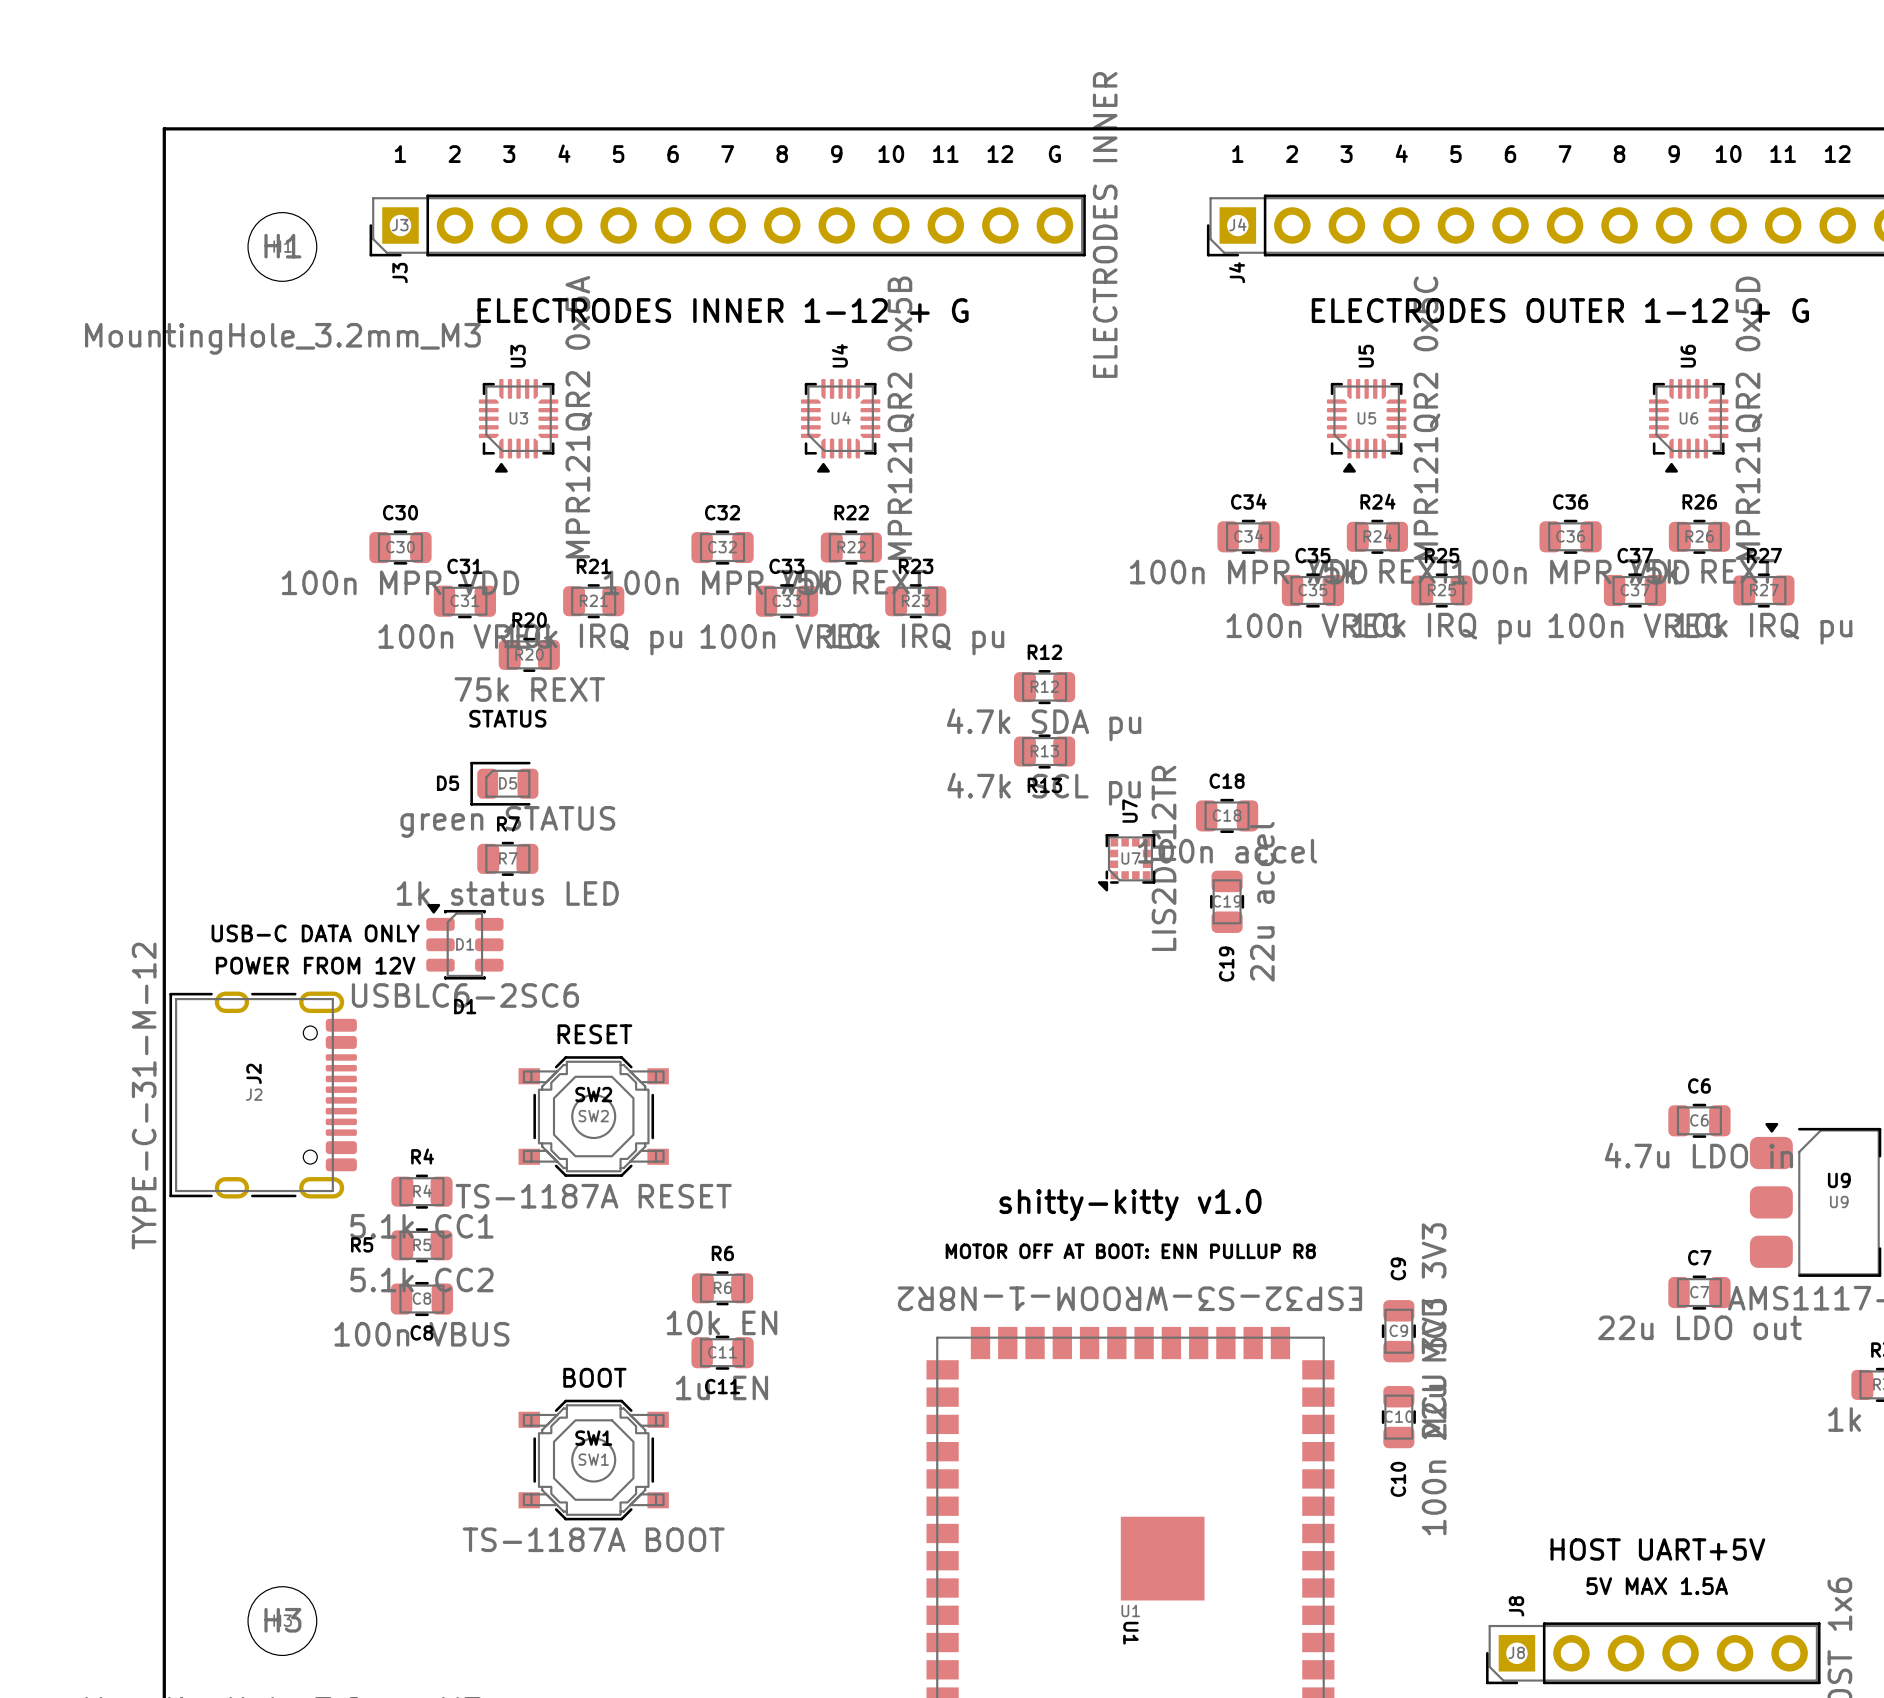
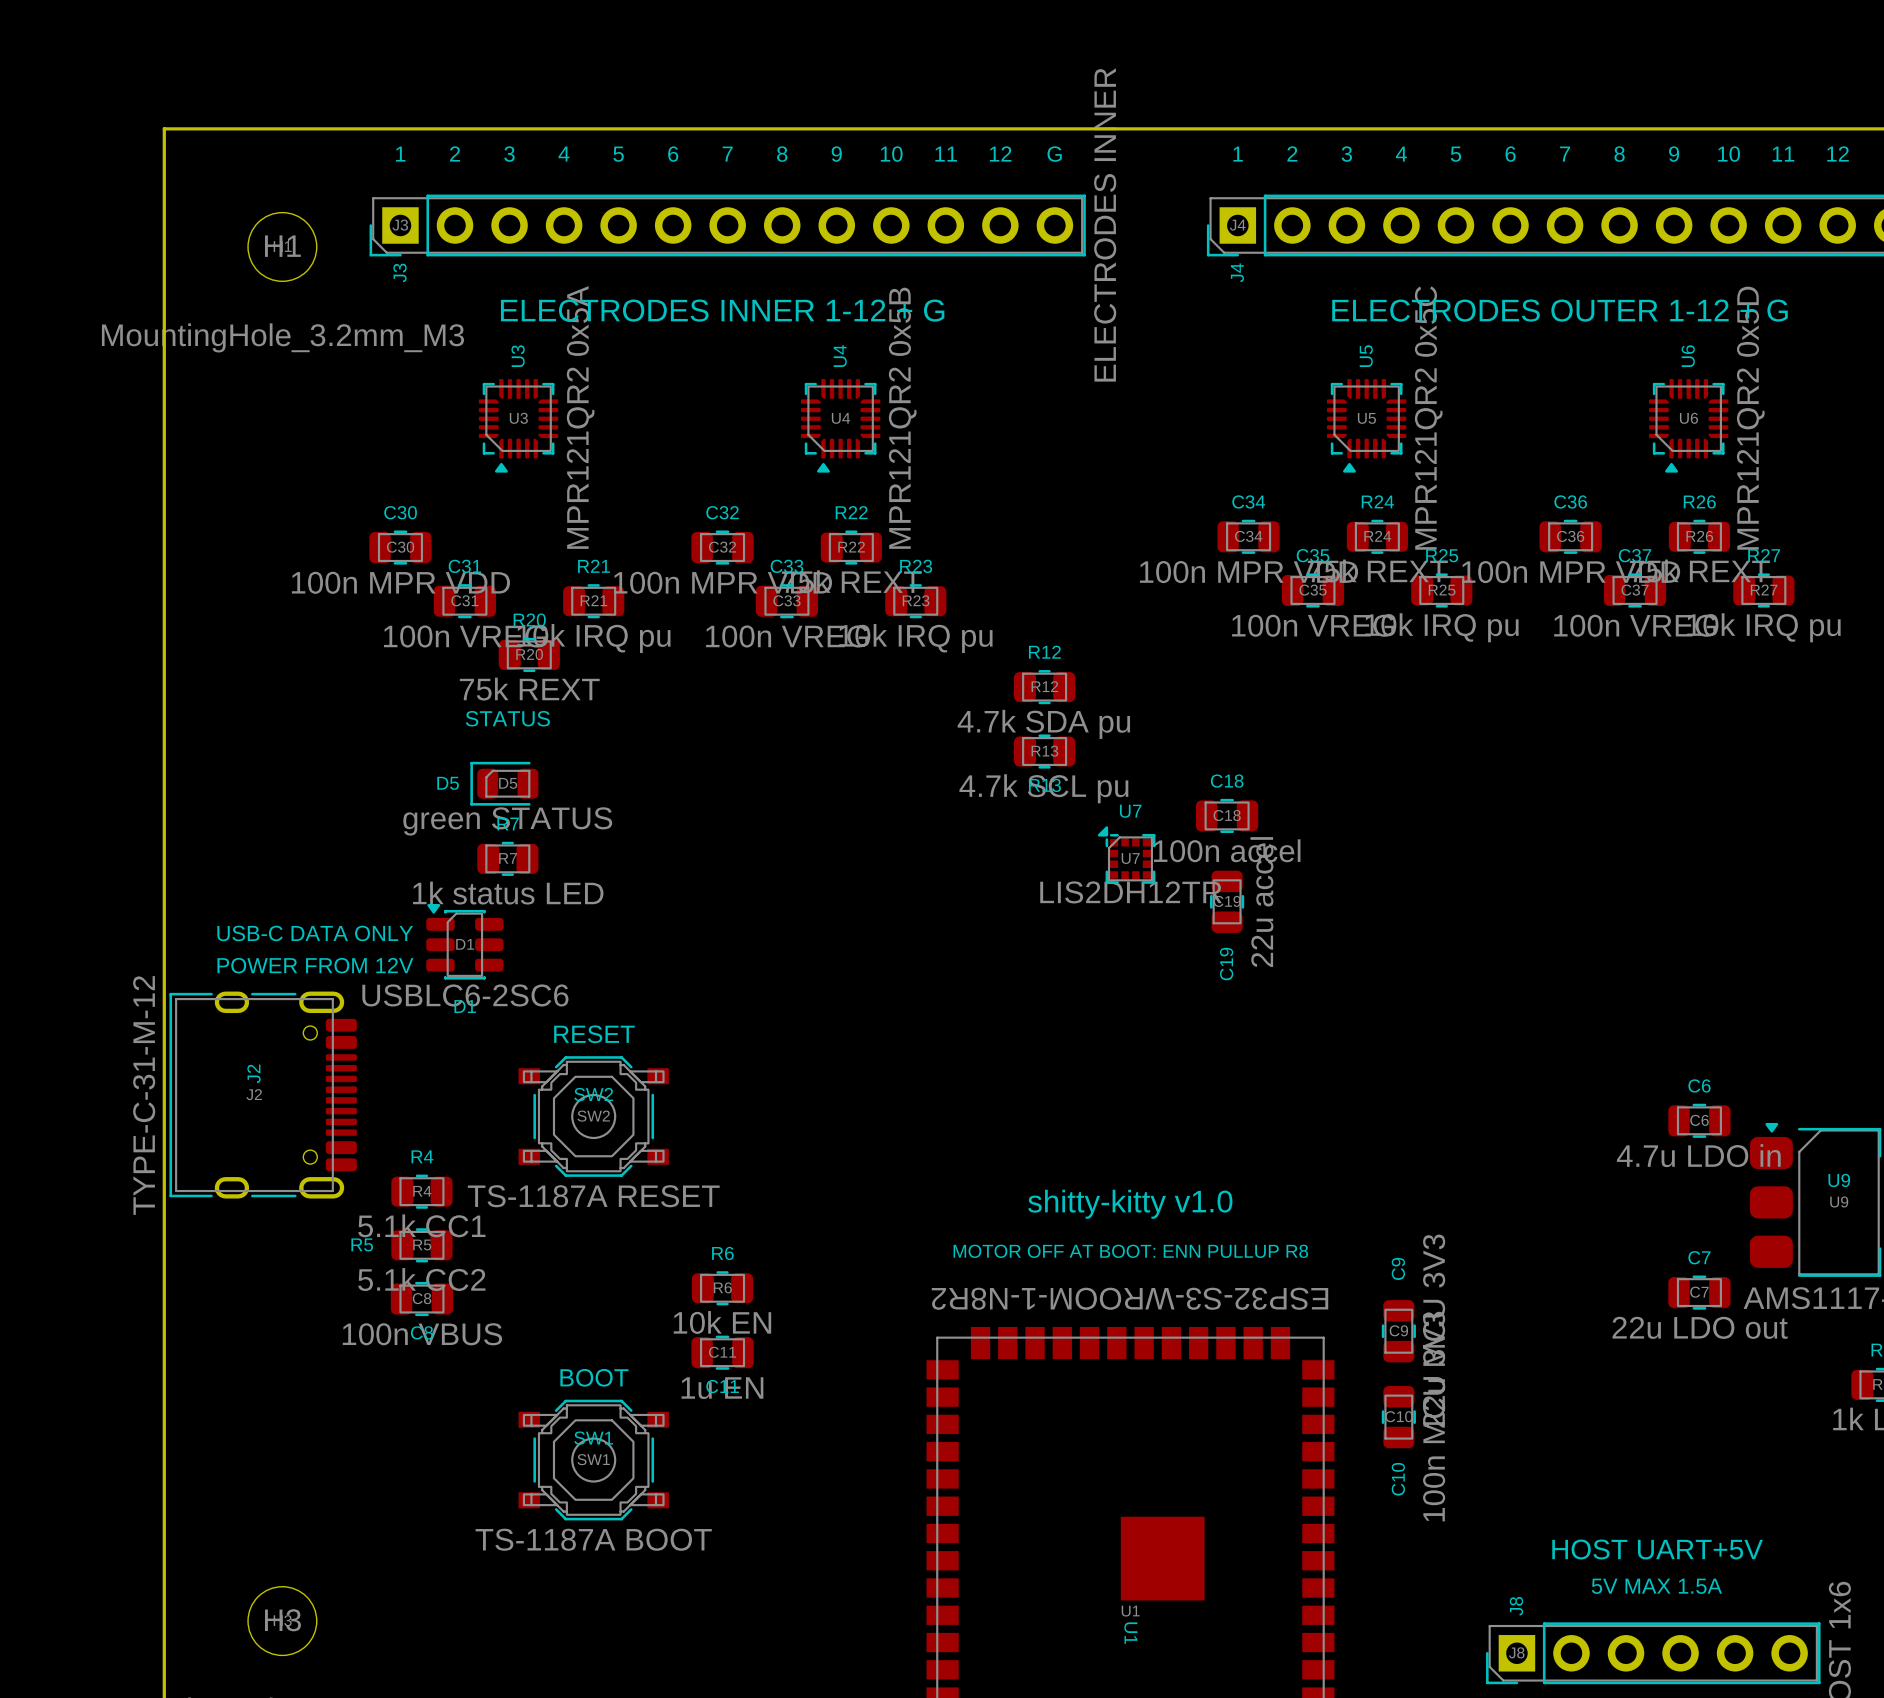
U7 rotation: 0° (1126, 862) -> 90° clockwise (1126, 855)

